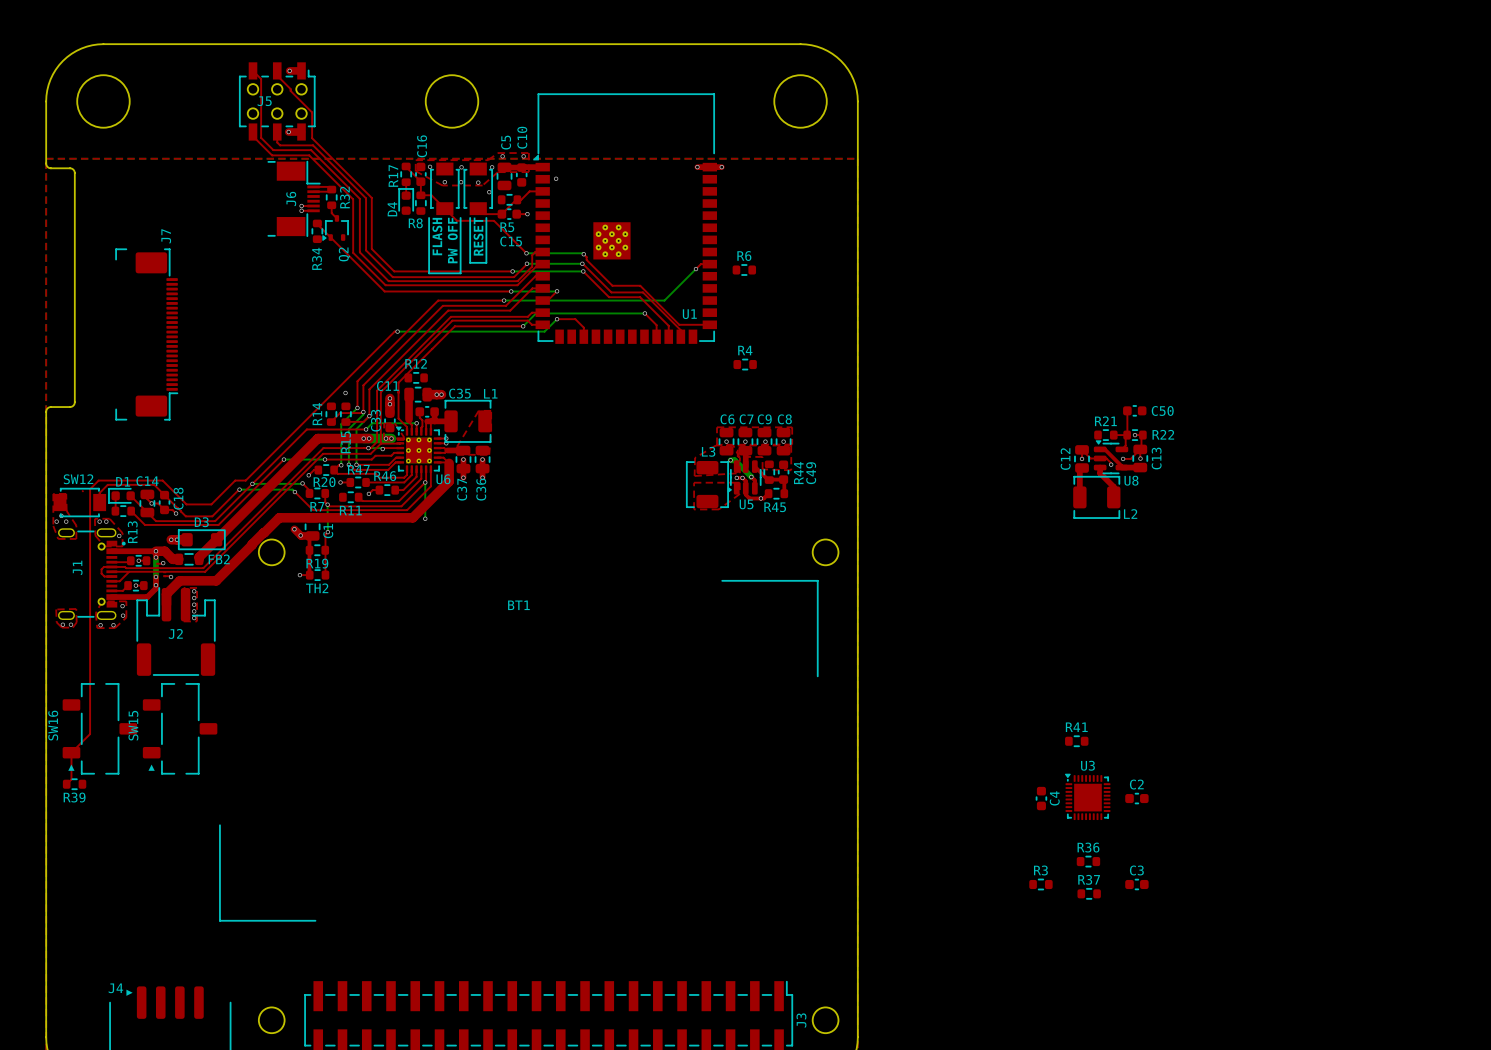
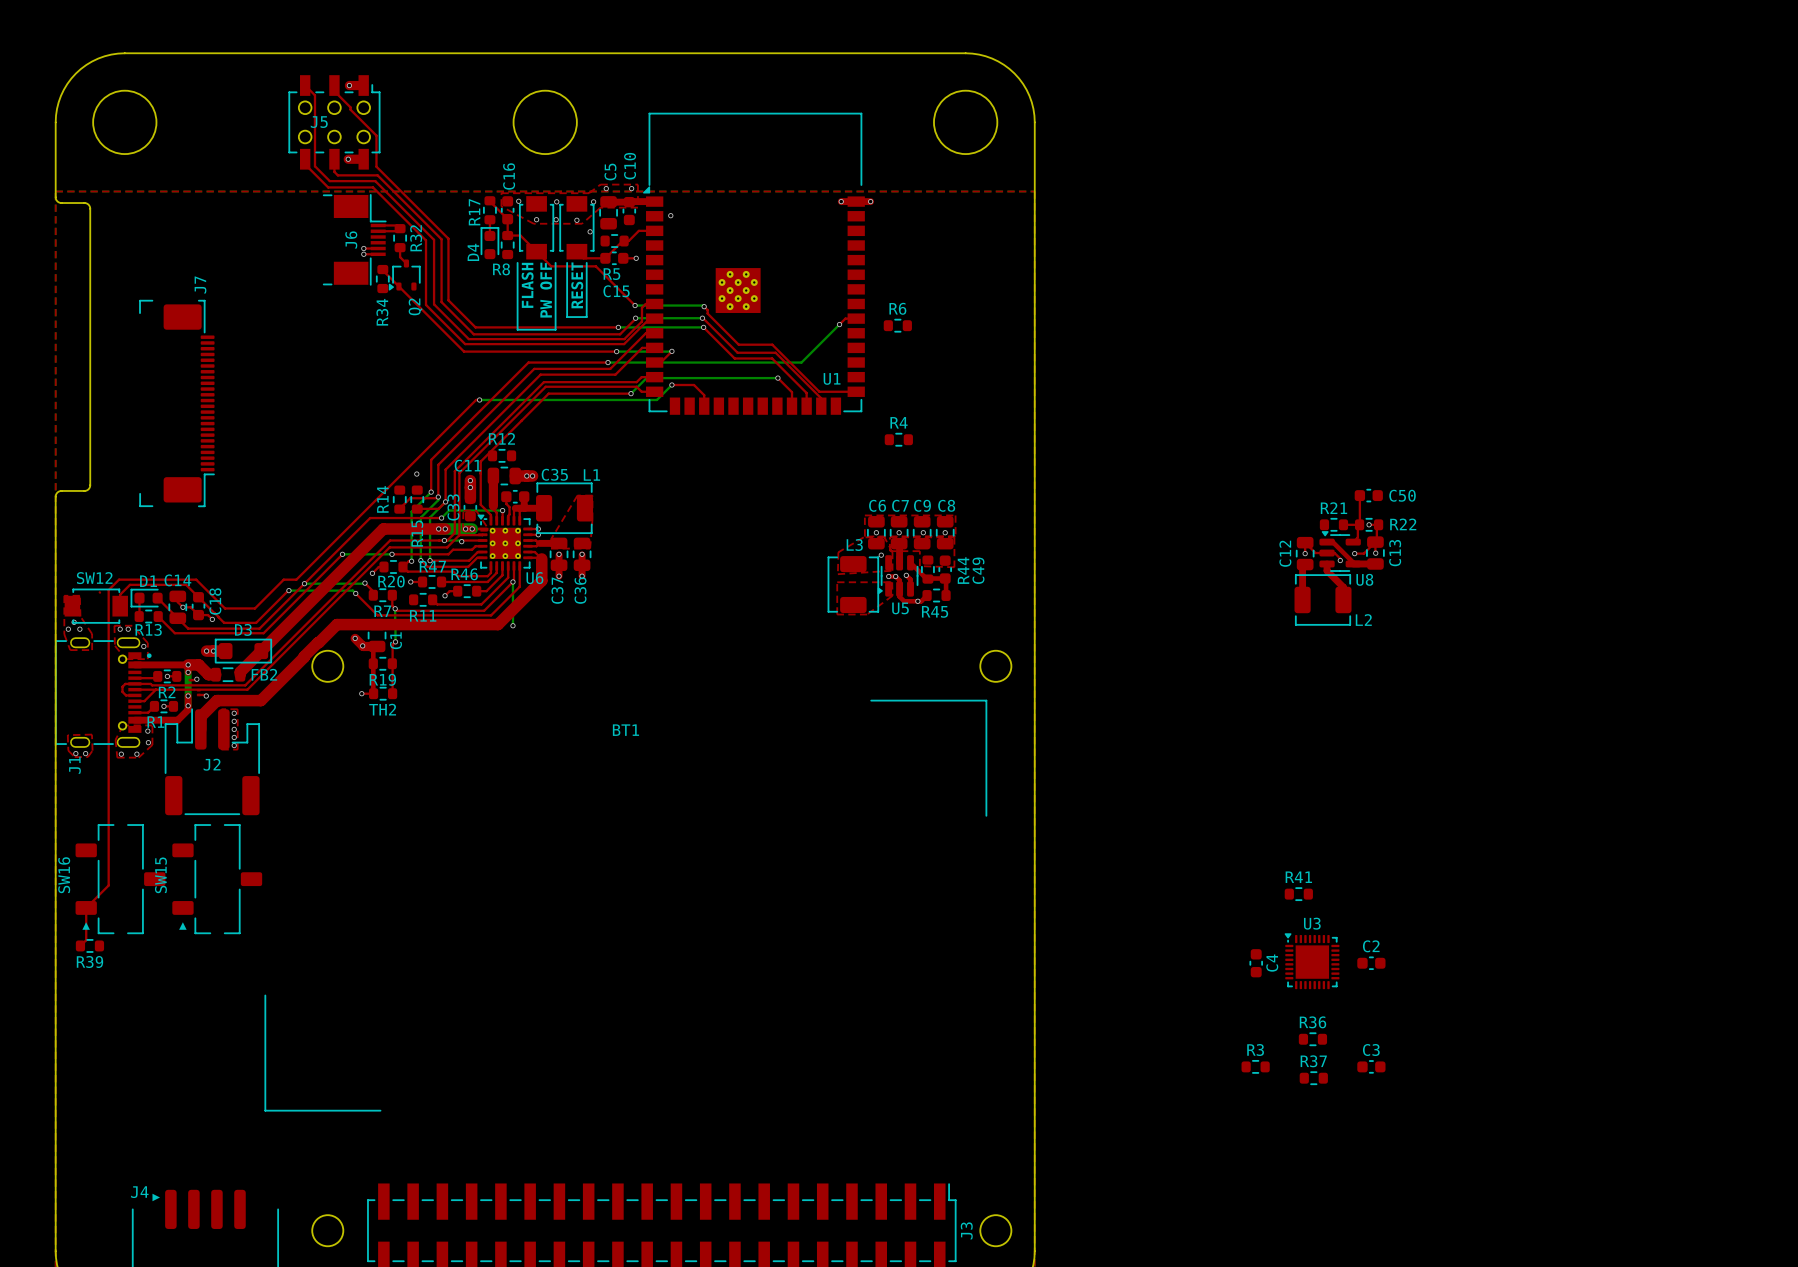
bottom track: (730, 460) (734, 460) (751, 476) -> none
J1 footprint: [57, 528, 126, 620] -> [55, 637, 152, 748]
R13 name rotation: 0° (132, 532) -> 90° clockwise (148, 629)
J1 name position: J1 (77, 567) -> J1 (74, 765)
R2 name: none -> R2 (167, 692)
R1 name: none -> R1 (155, 722)

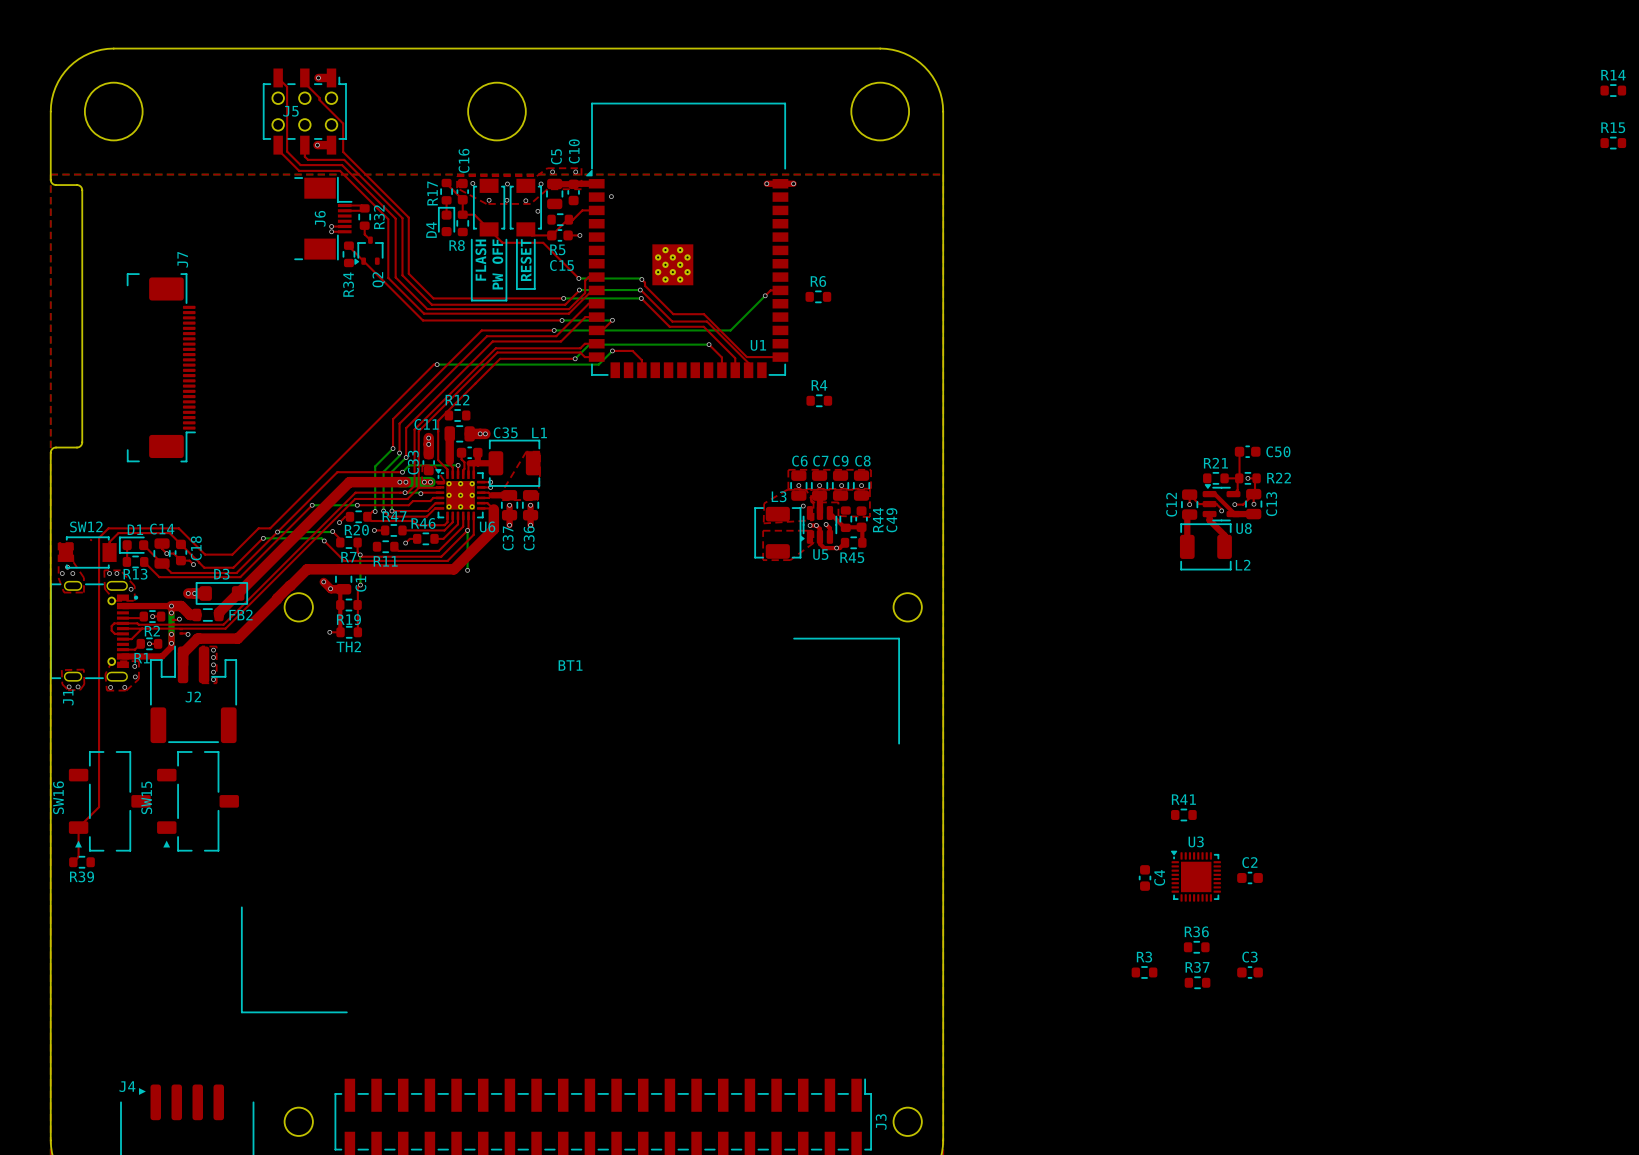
via: (416, 474) -> none
top track: (438, 497) (410, 498) (399, 508) -> none
R14 rotation: 0° (399, 499) -> 90° clockwise (1613, 90)
R14 position: (399, 499) -> (1613, 90)
R15 rotation: 0° (417, 499) -> 90° clockwise (1613, 143)
R15 position: (417, 499) -> (1613, 143)
top track: (445, 501) (438, 508) (417, 508) -> none
R15 name position: R15 (417, 533) -> R15 (1613, 127)

